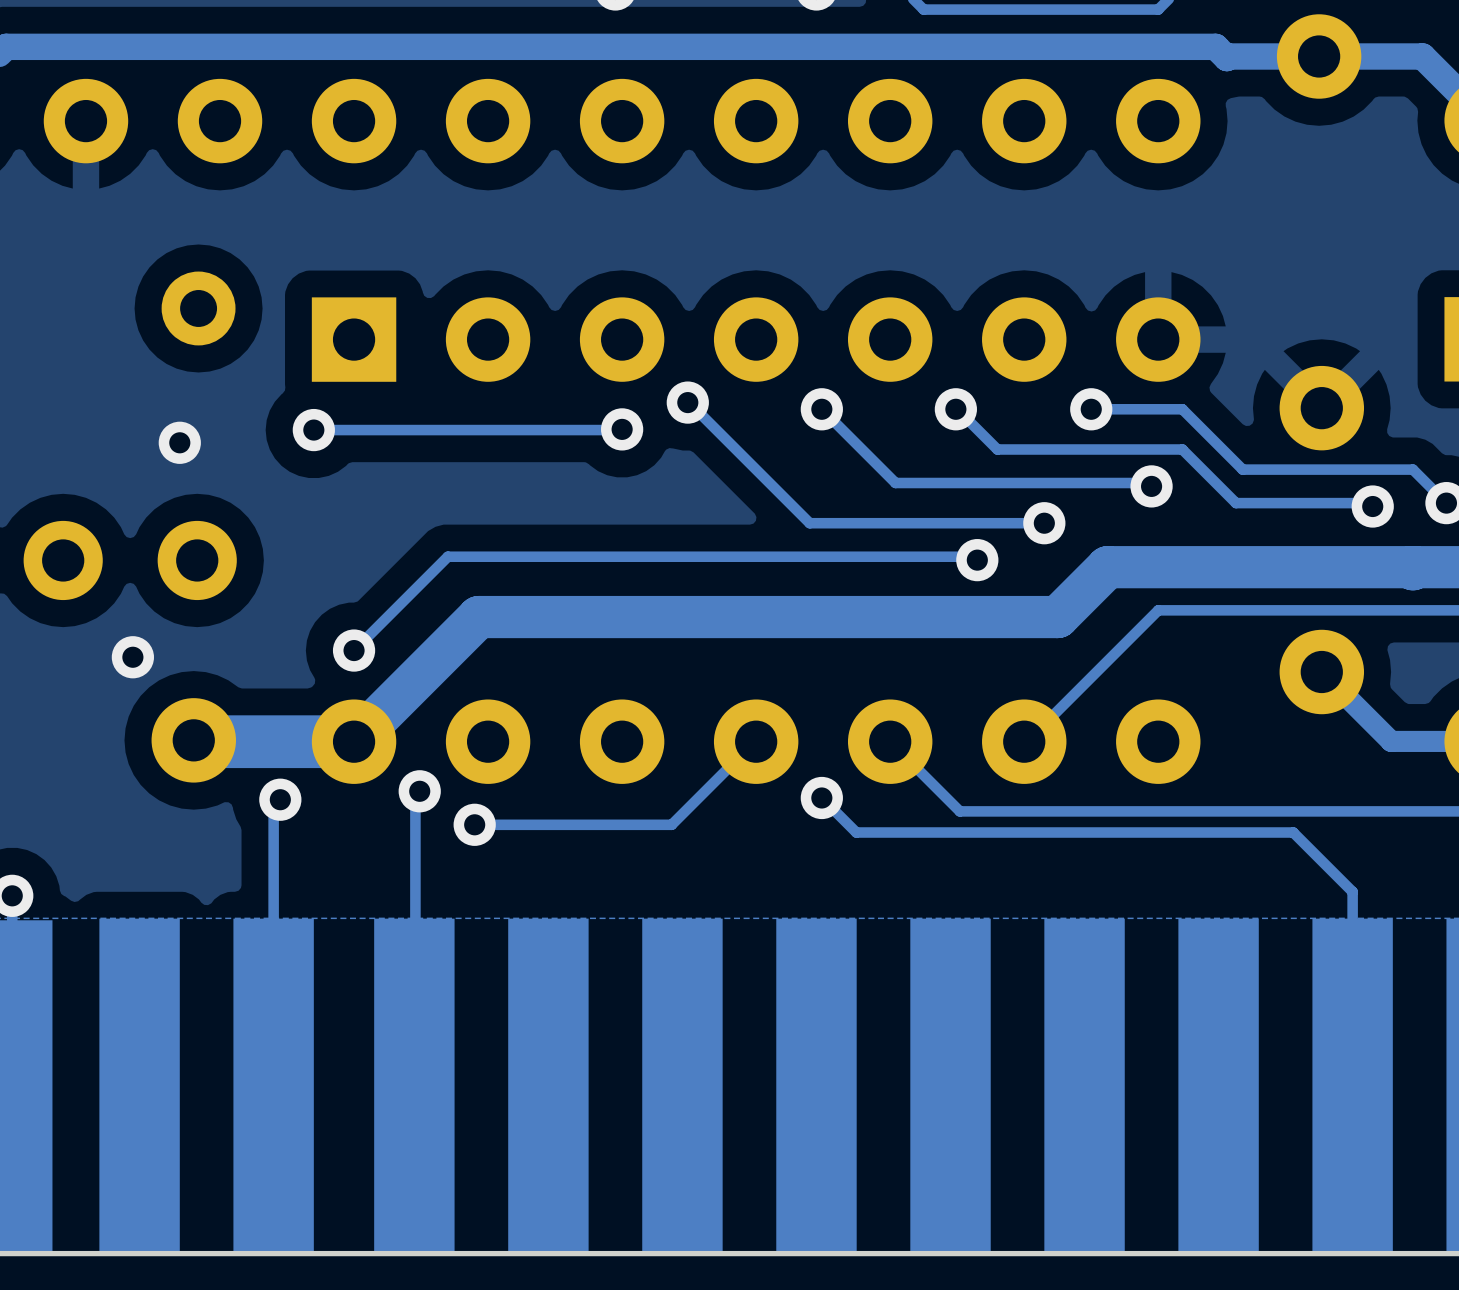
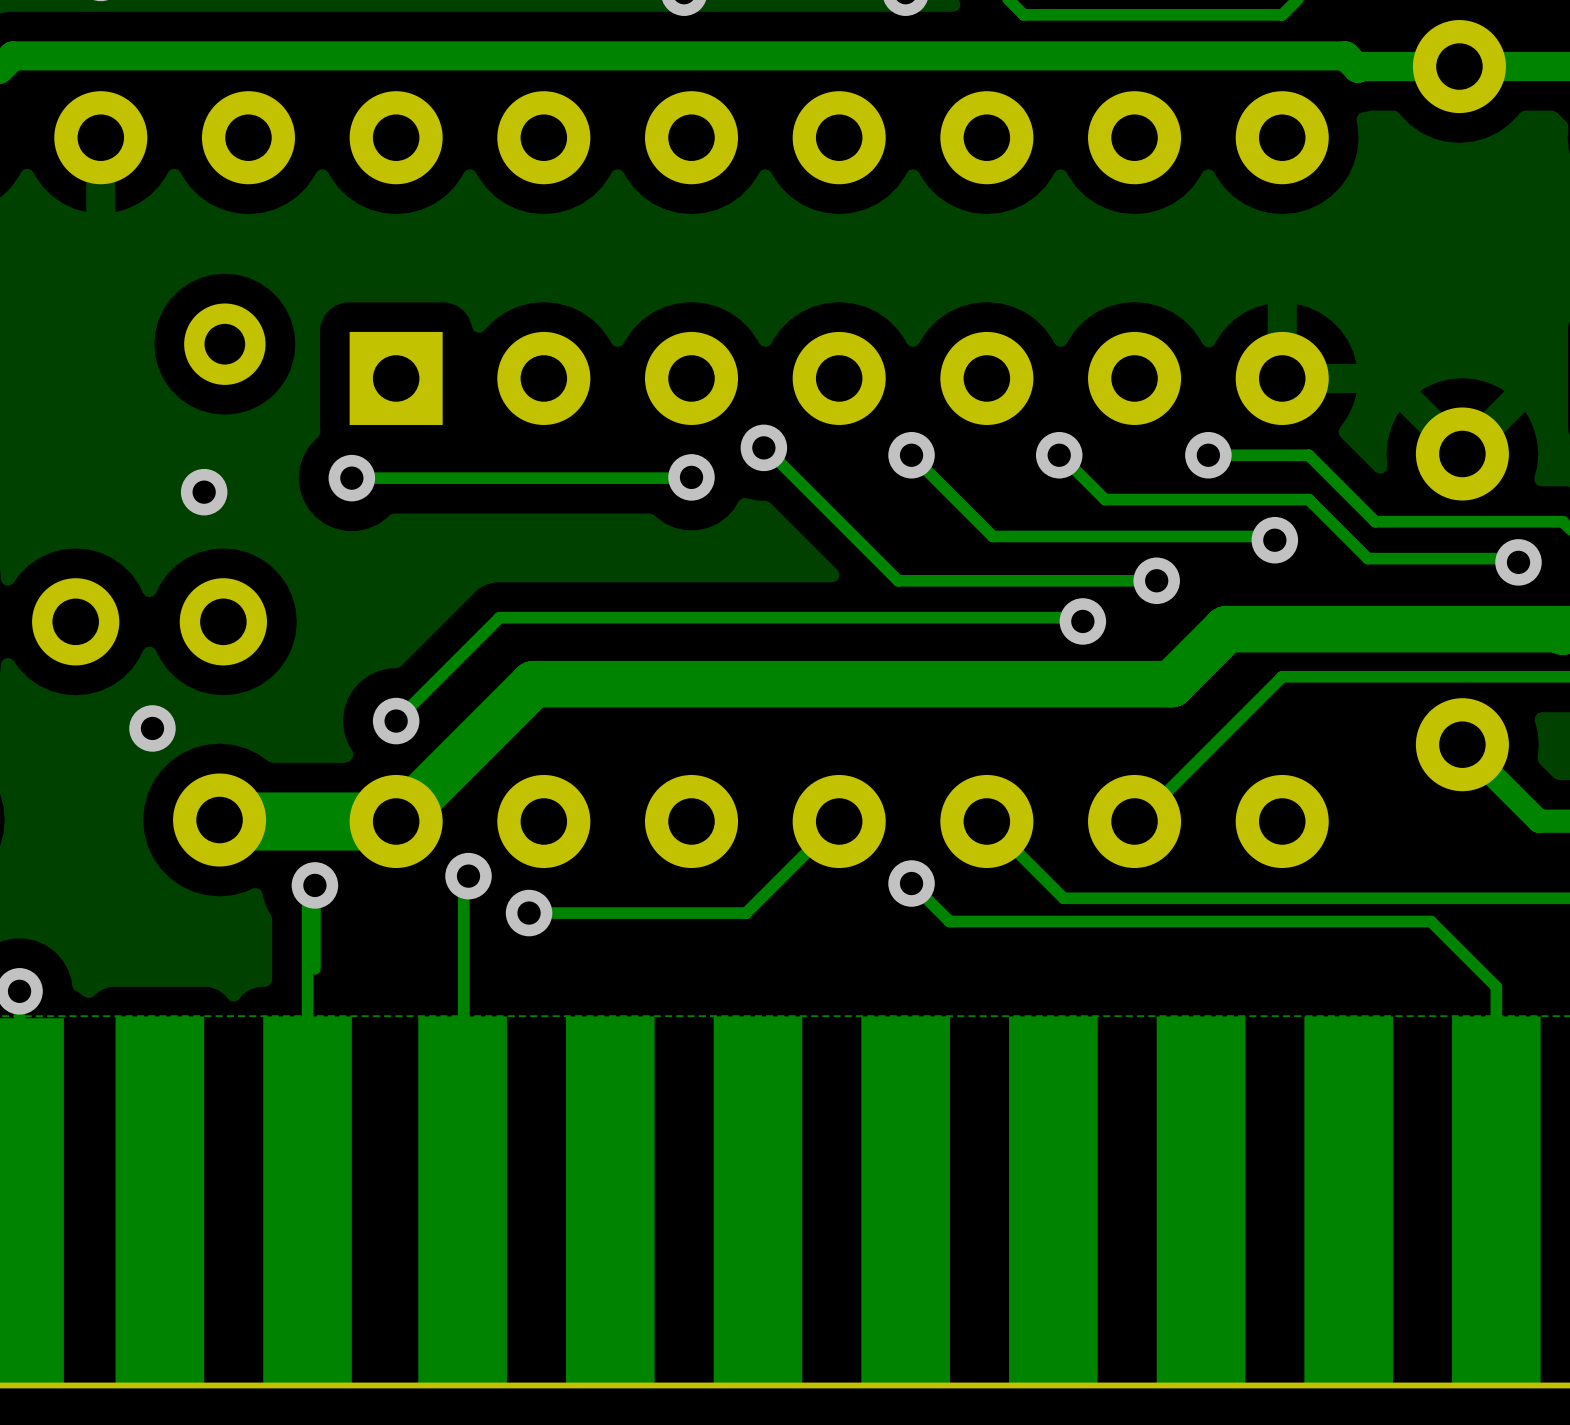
track: none -> (314, 885) (314, 968)

